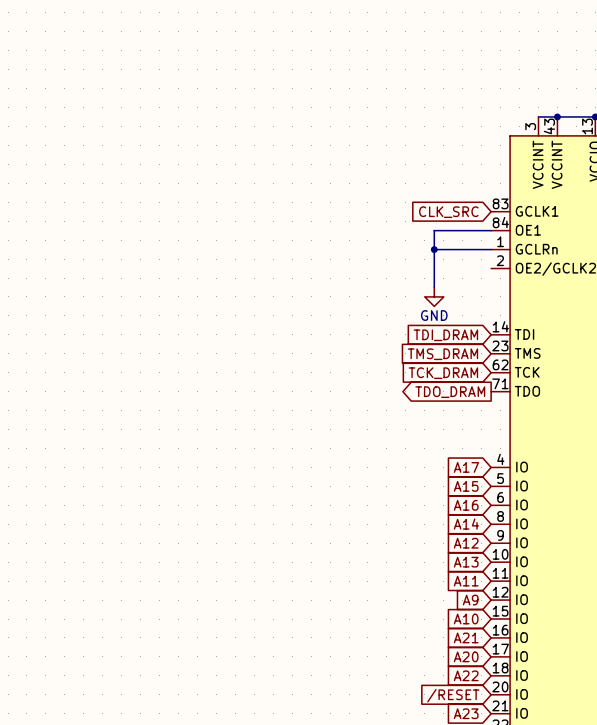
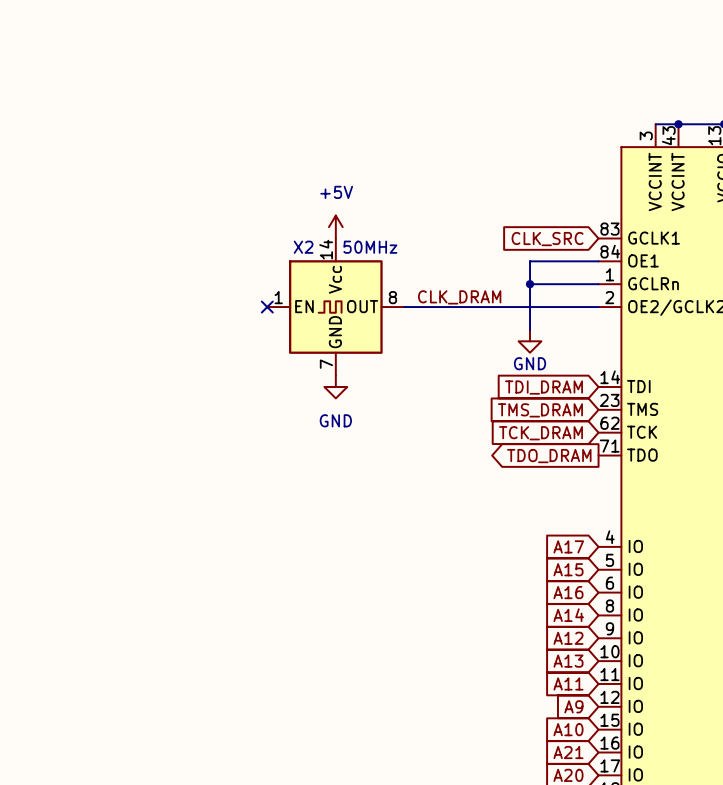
power symbol: none -> +5V (335, 227)
label: none -> CLK_DRAM (459, 297)
no-connect mark: none -> (267, 307)
X2: none -> 50MHz (335, 307)
wire: none -> (404, 307) (598, 307)
power symbol: none -> GND (335, 386)

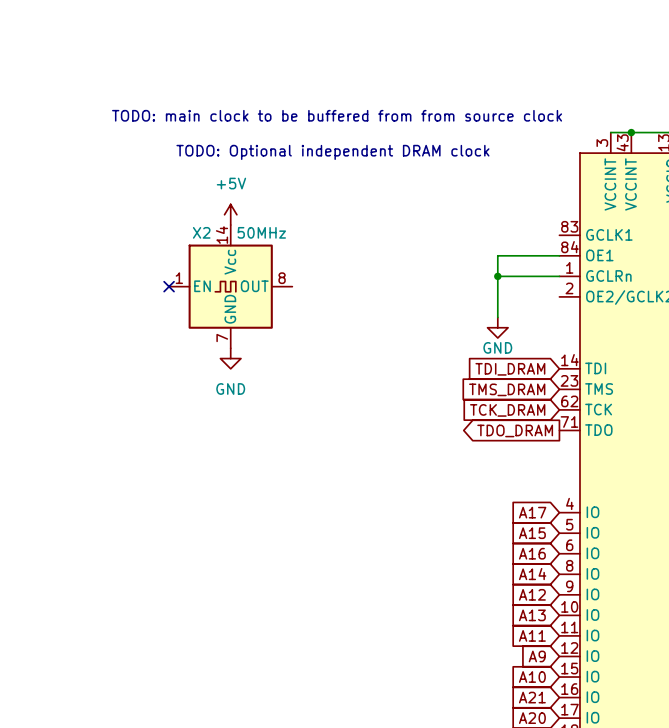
text: none -> TODO: main clock to be buffered from from source clock (337, 115)
text: none -> TODO: Optional independent DRAM clock (332, 152)
power symbol position: +5V (335, 227) -> +5V (230, 214)
global label: CLK_SRC (547, 239) -> none
no-connect mark: none -> (169, 286)
label: CLK_DRAM (459, 297) -> none
no-connect mark: (267, 307) -> none
X2 position: (335, 307) -> (230, 286)
wire: (404, 307) (598, 307) -> none
power symbol position: GND (335, 386) -> GND (230, 358)

